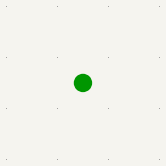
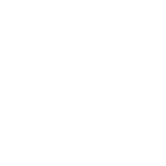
junction: (82, 82) -> none

